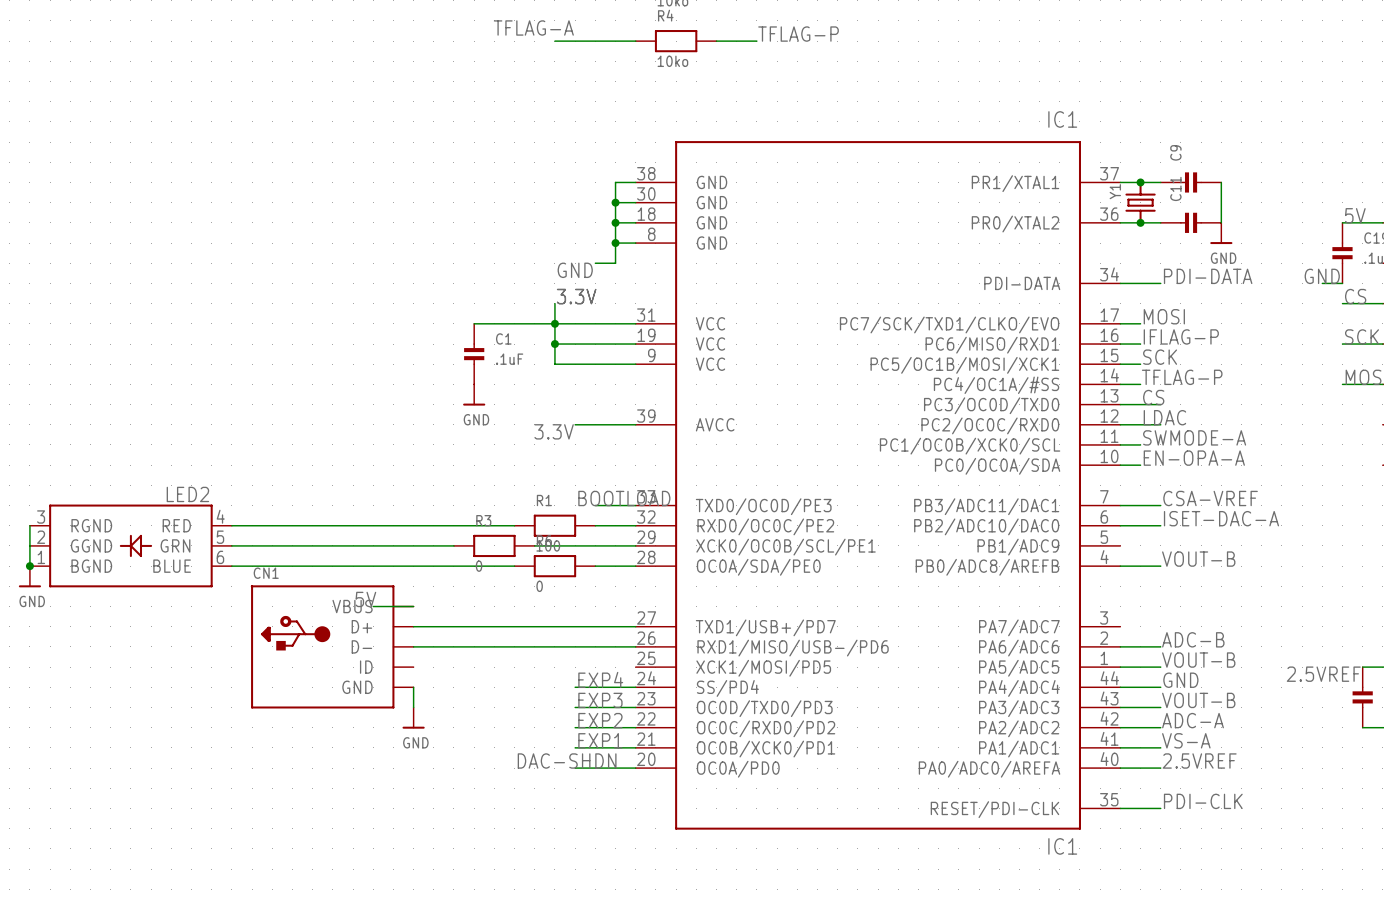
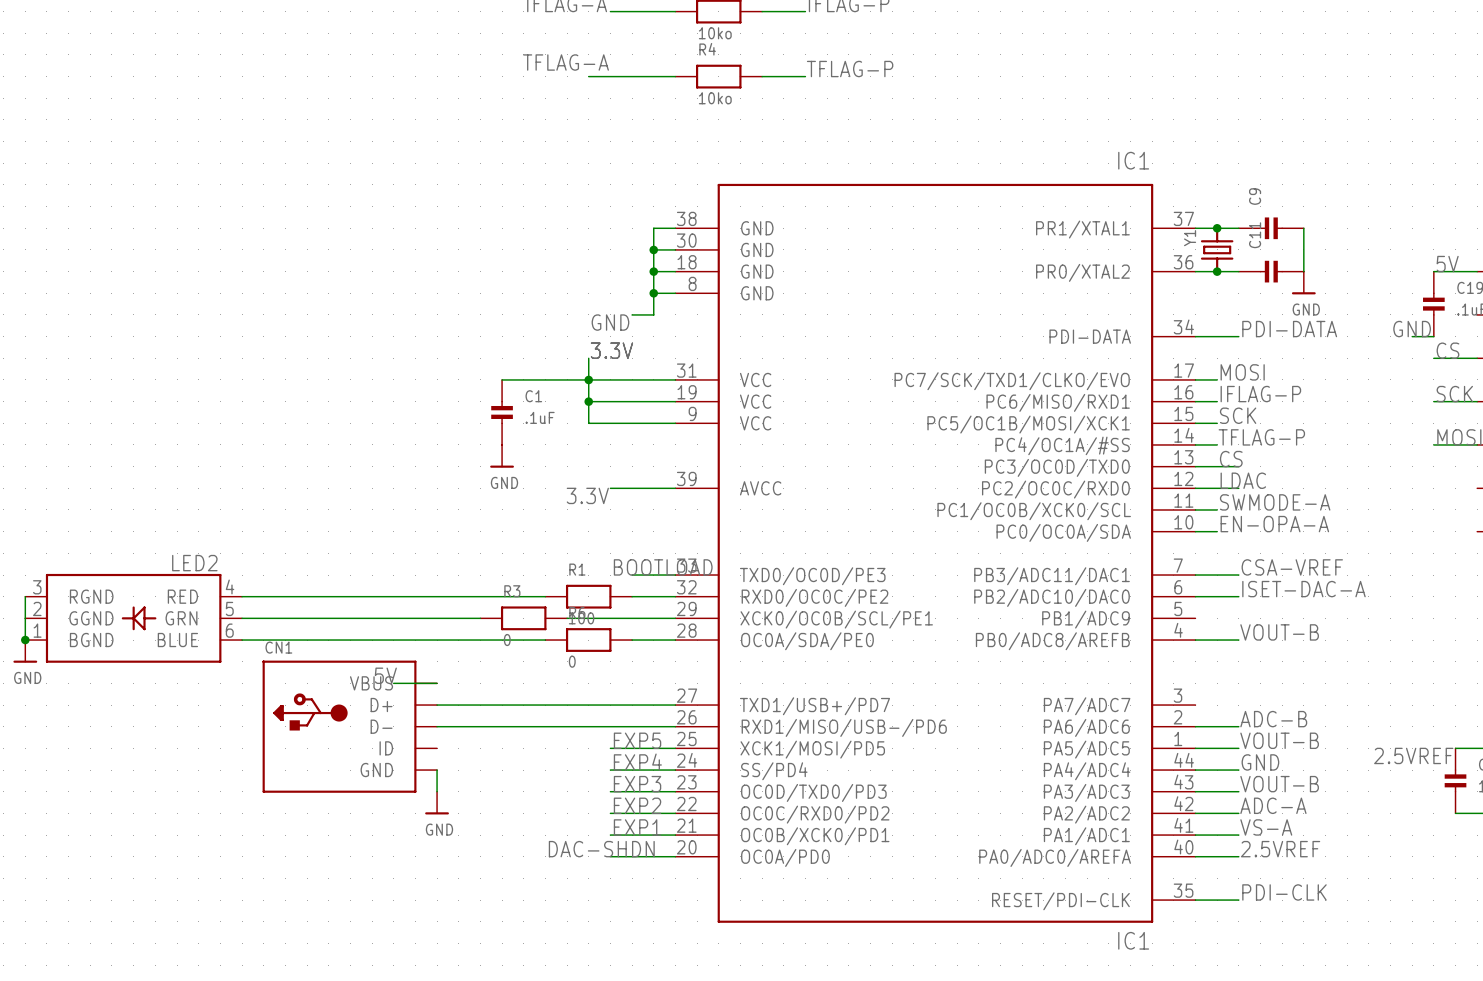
label: none -> EXP5 (637, 740)
wire: none -> (610, 748) (675, 748)

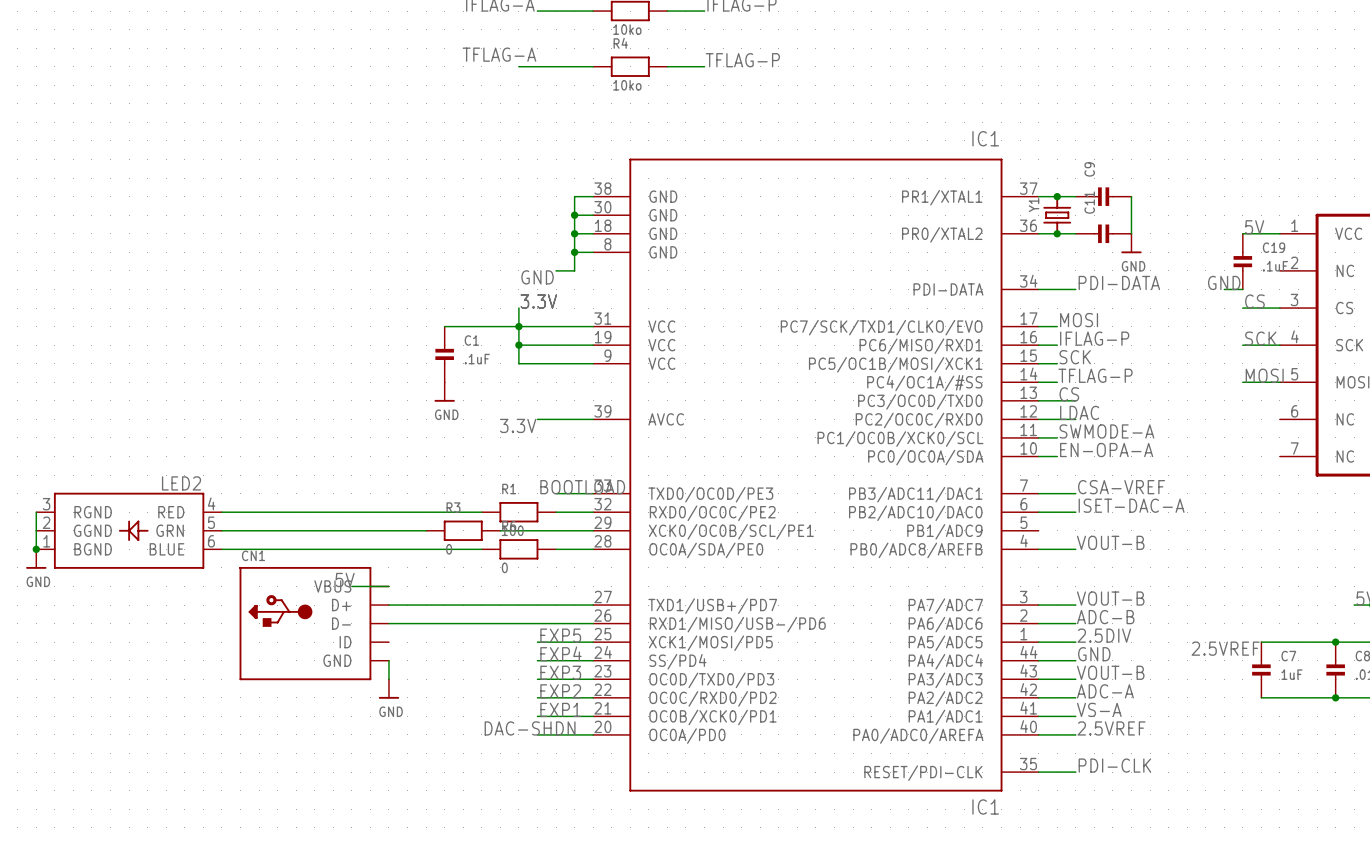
label: none -> VOUT-B (1110, 598)
wire: none -> (1038, 605) (1075, 605)
label: VOUT-B (1279, 740) -> 2.5DIV (1104, 635)

